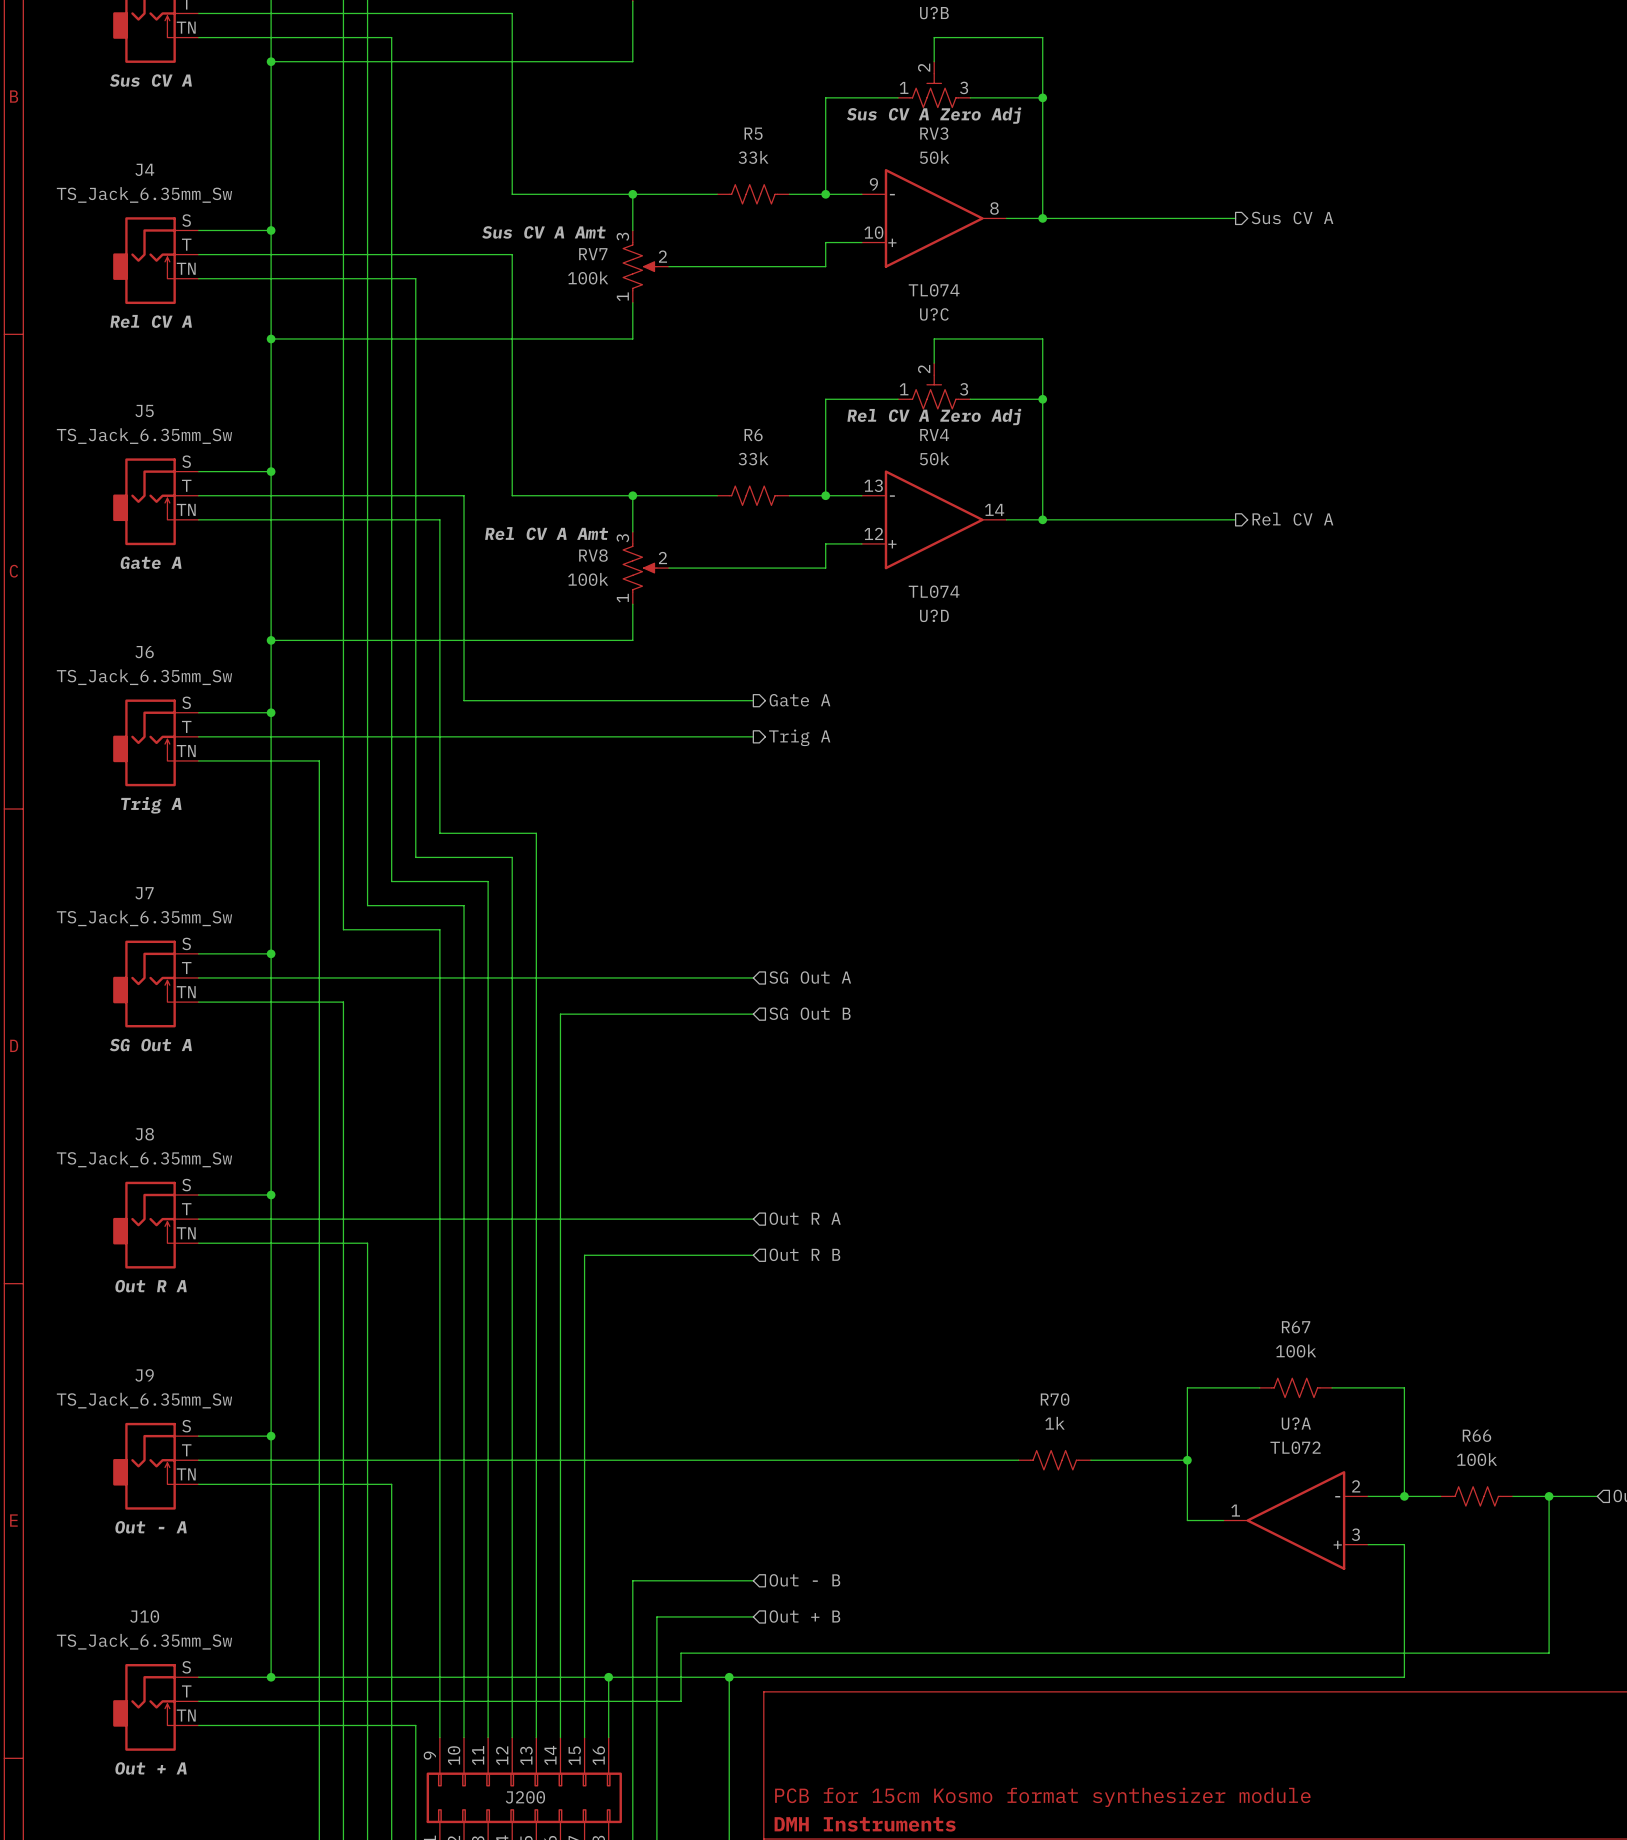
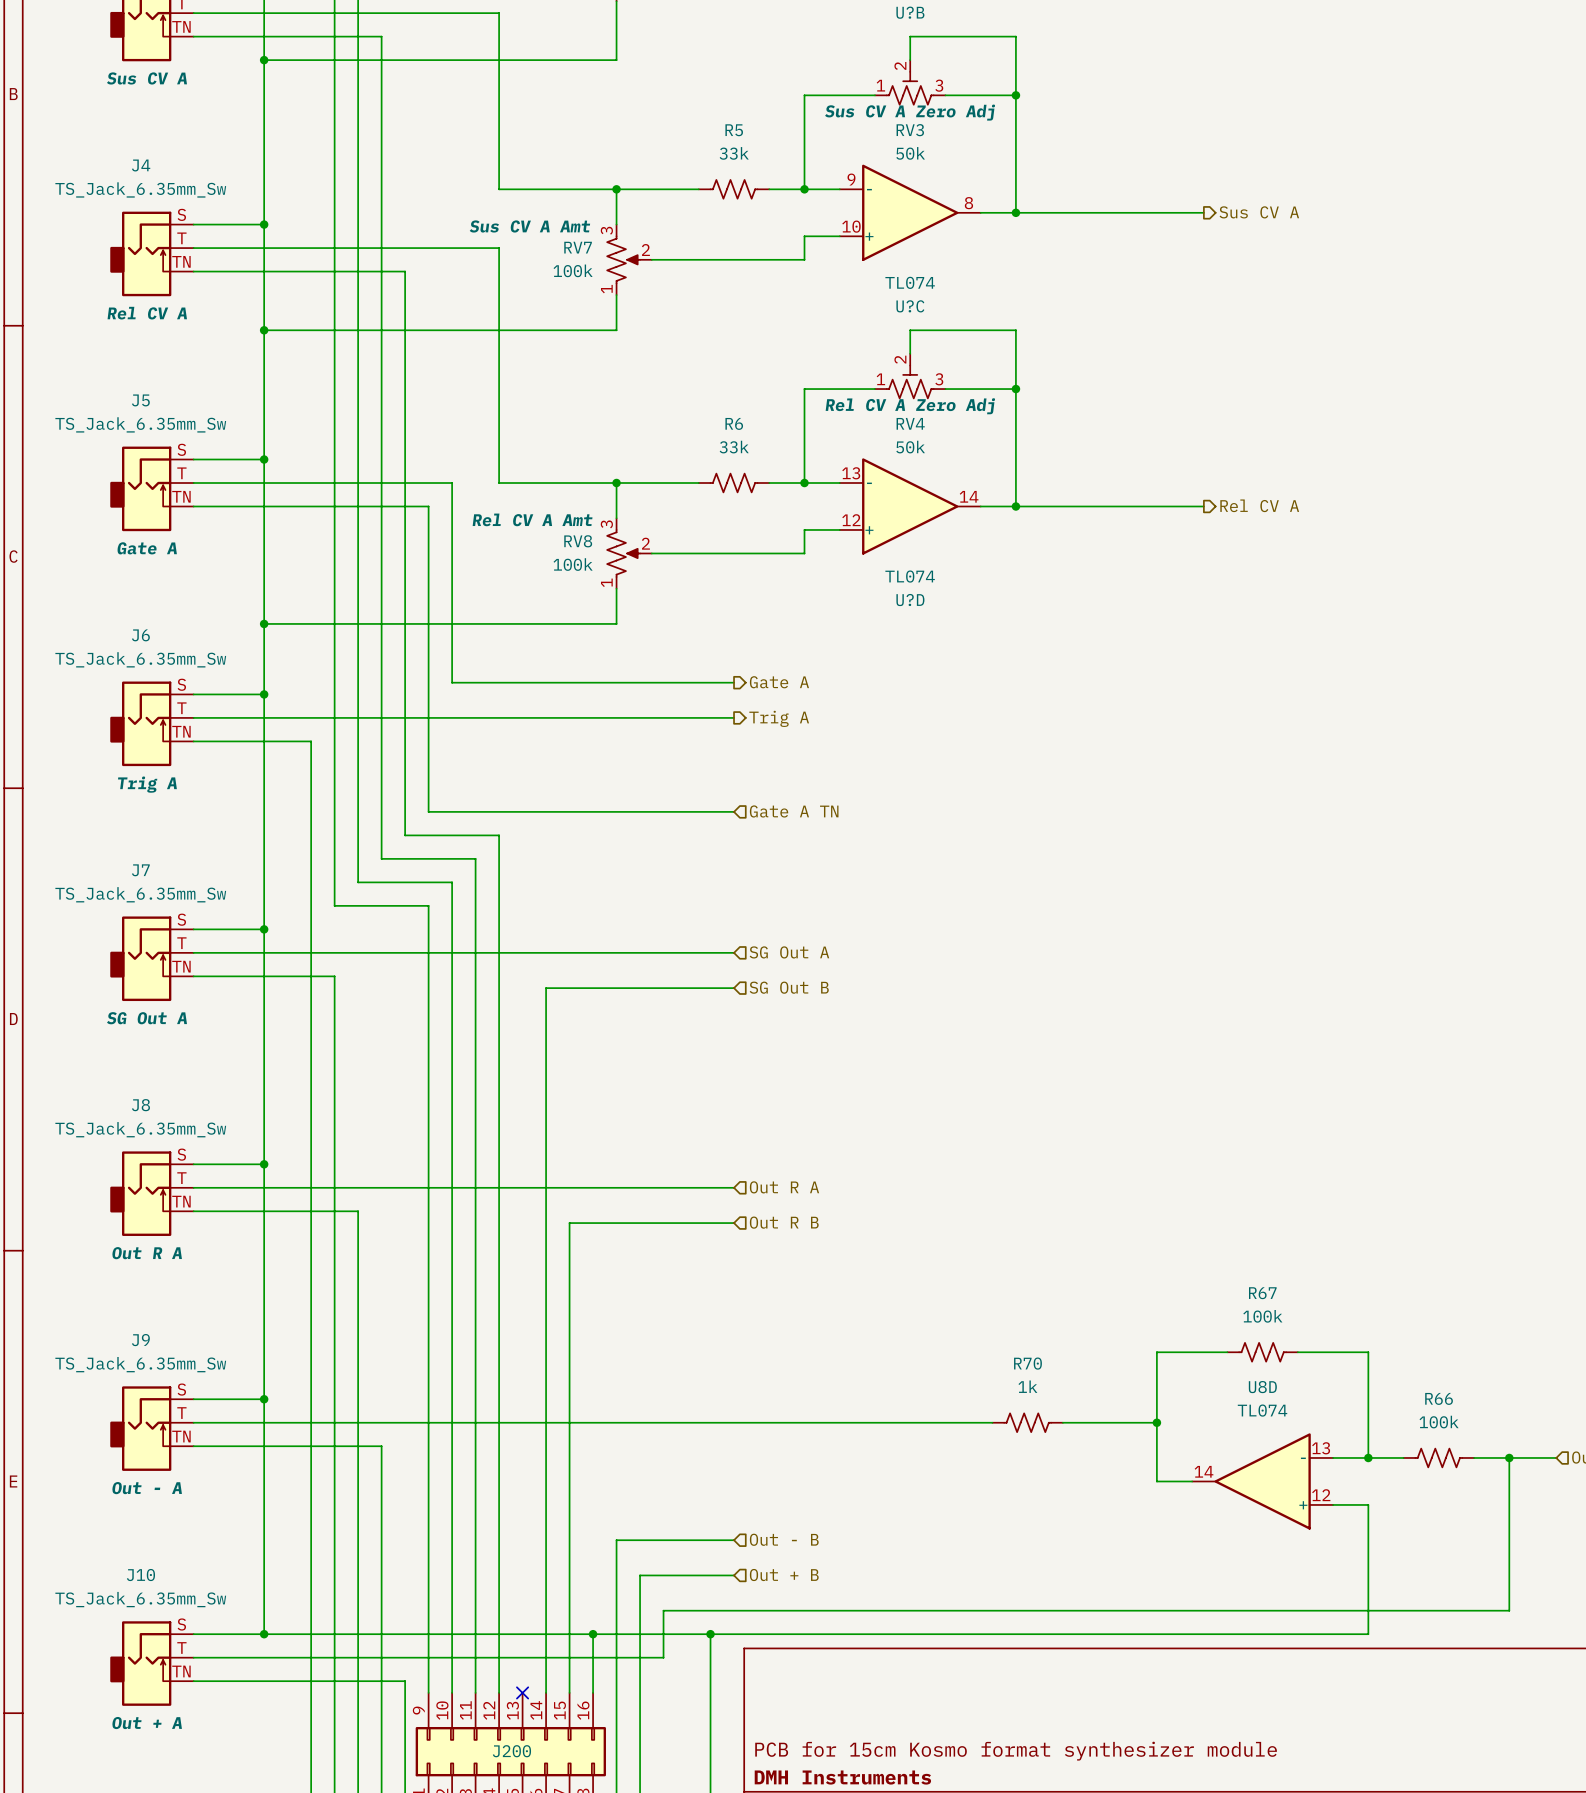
hierarchical label: none -> Gate A TN (794, 811)
wire: (536, 833) (536, 1737) -> (522, 811) (734, 811)
U?A name: U?A (1296, 1423) -> U8D (1262, 1387)
U?A value: TL072 (1295, 1447) -> TL074 (1262, 1410)
U?A pin number: 2 (1356, 1486) -> 13 (1321, 1448)
U?A pin number: 1 (1235, 1510) -> 14 (1204, 1471)
U?A pin number: 3 (1355, 1534) -> 12 (1321, 1495)
no-connect mark: none -> (522, 1692)

